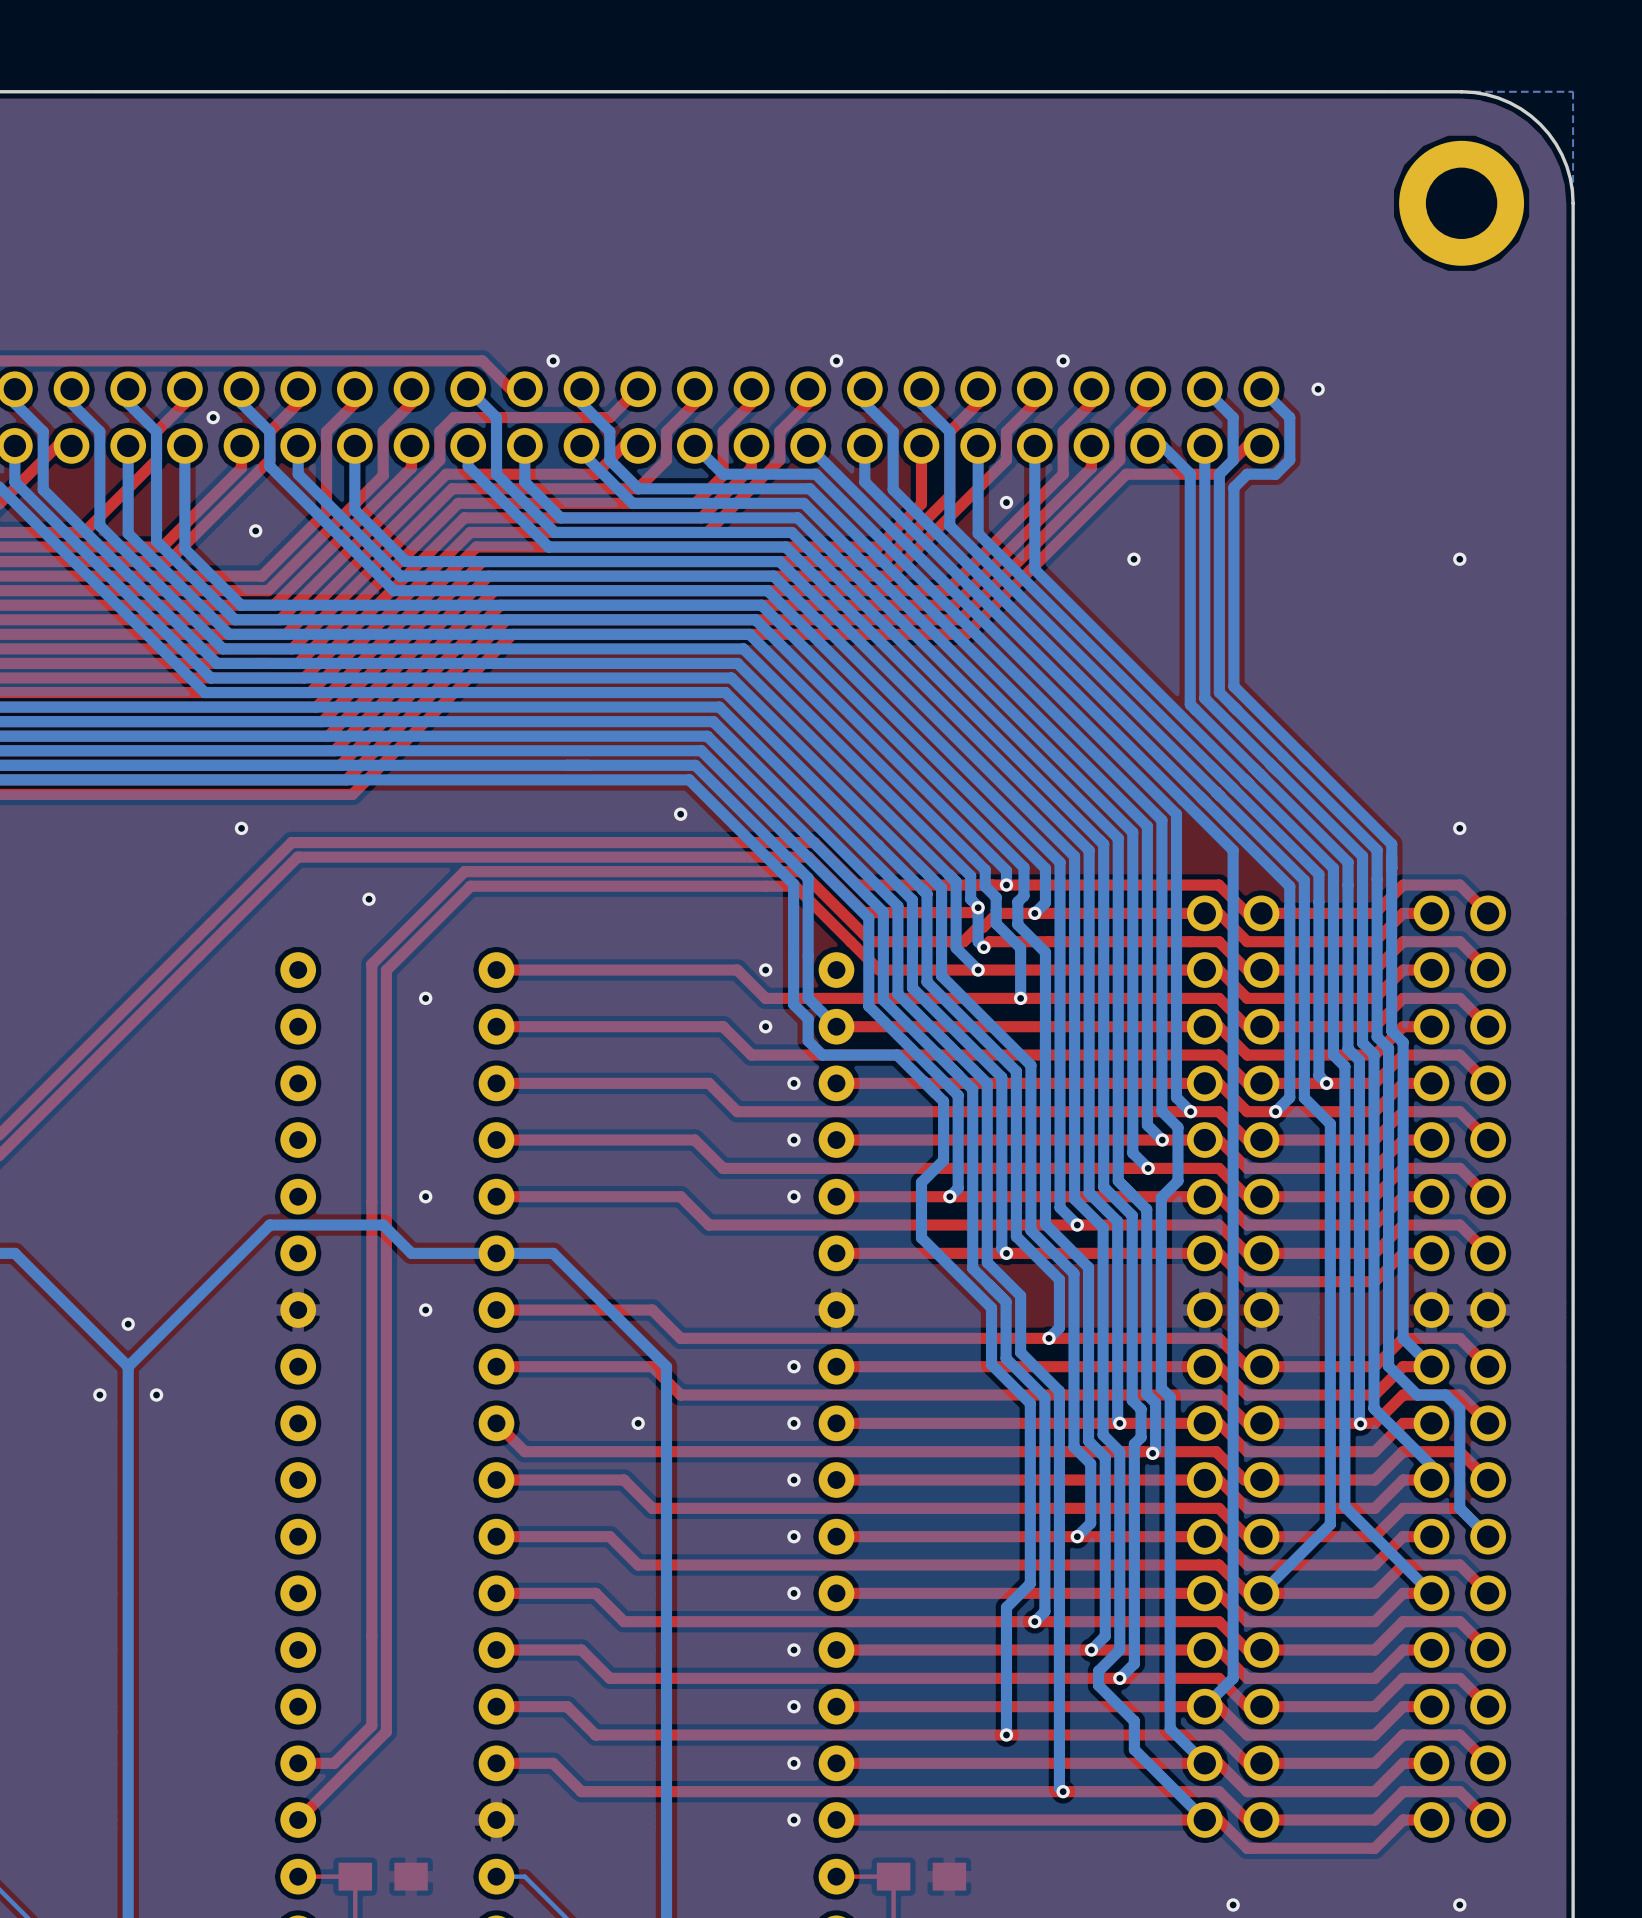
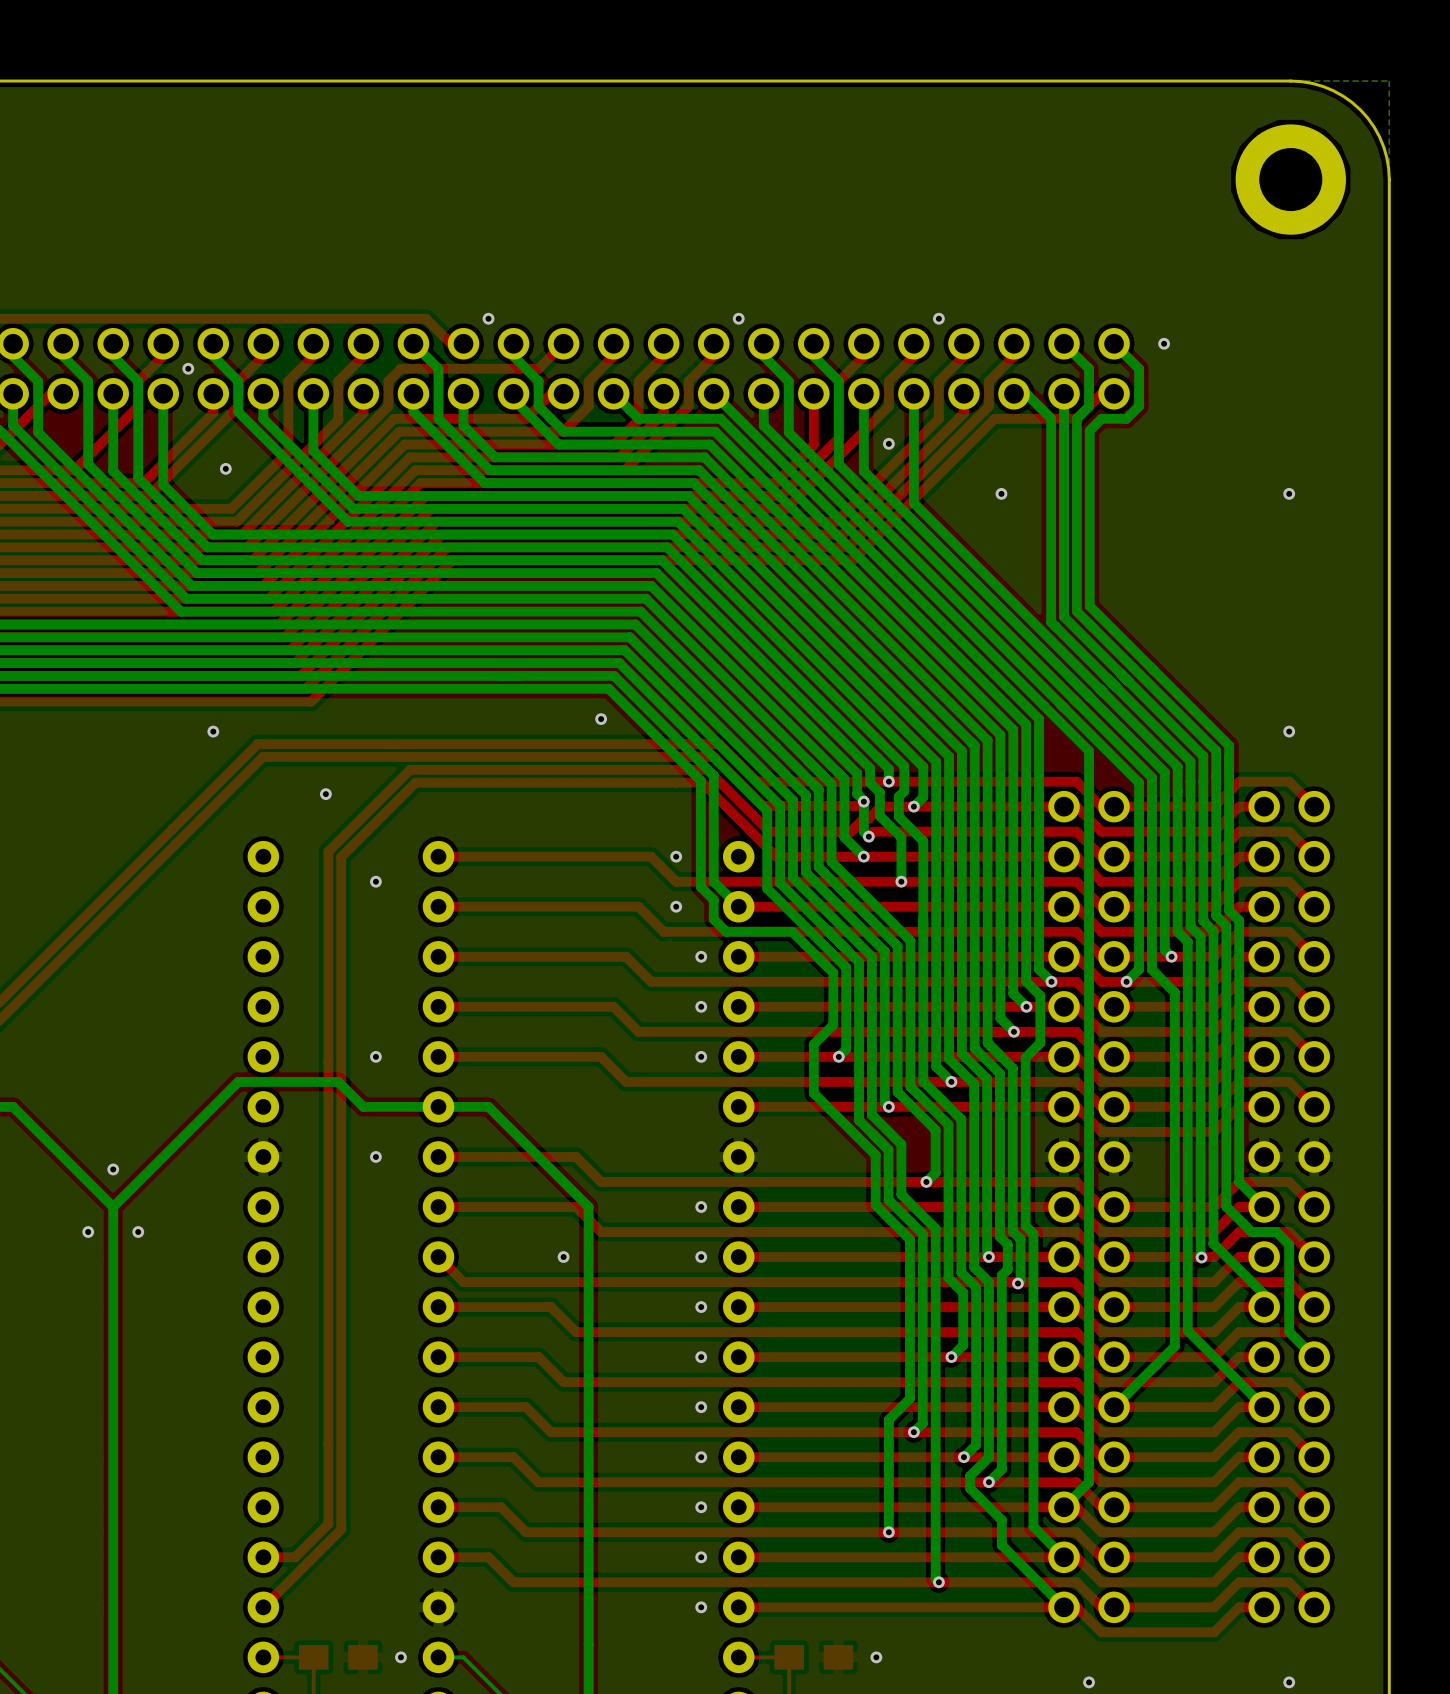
via: none -> (400, 1657)
via: none -> (876, 1657)

